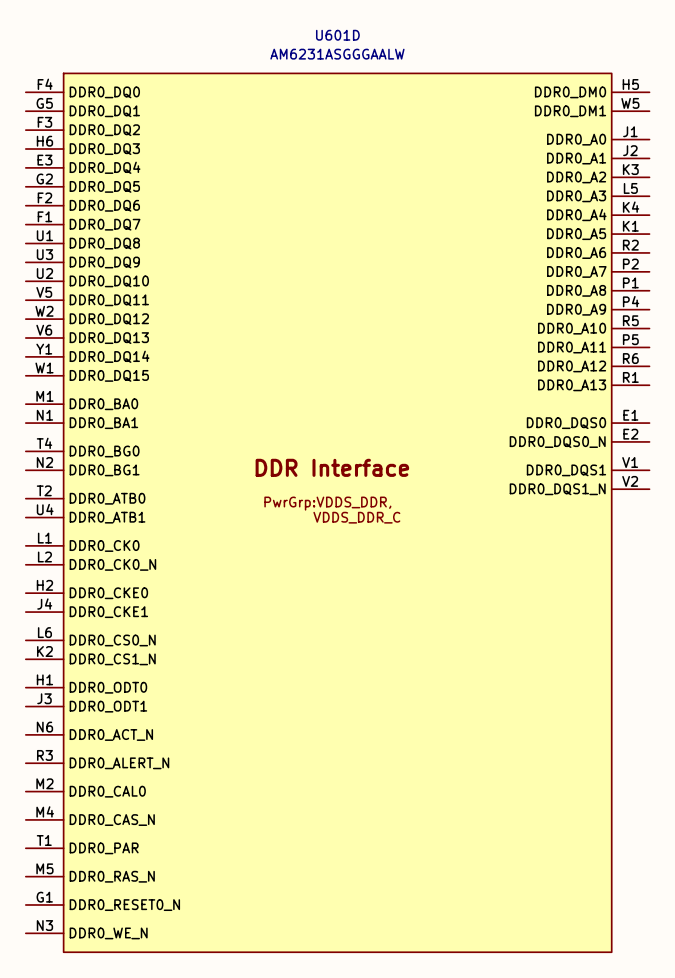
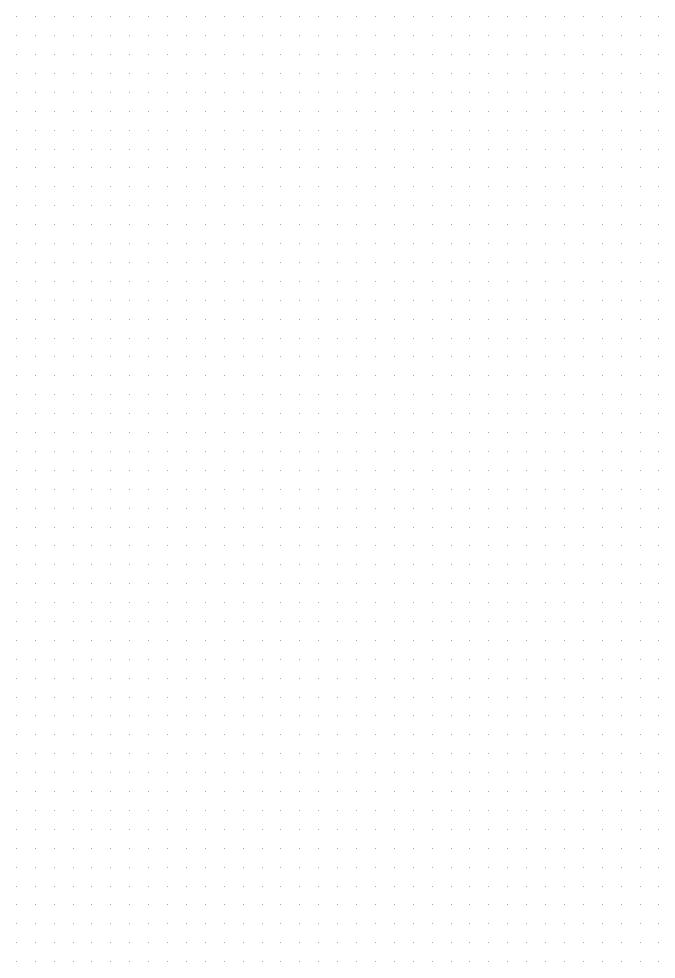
U601D: AM6231ASGGGAALW (337, 512) -> none

